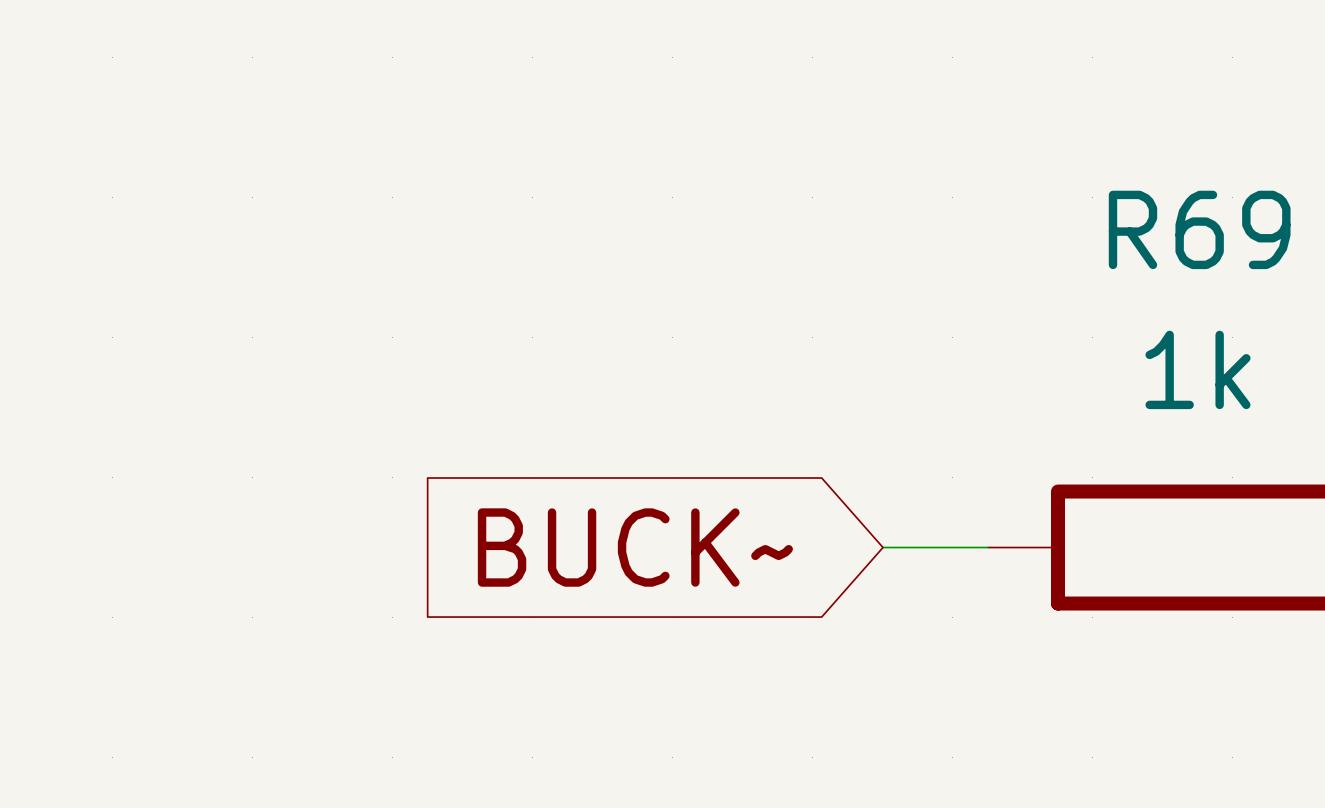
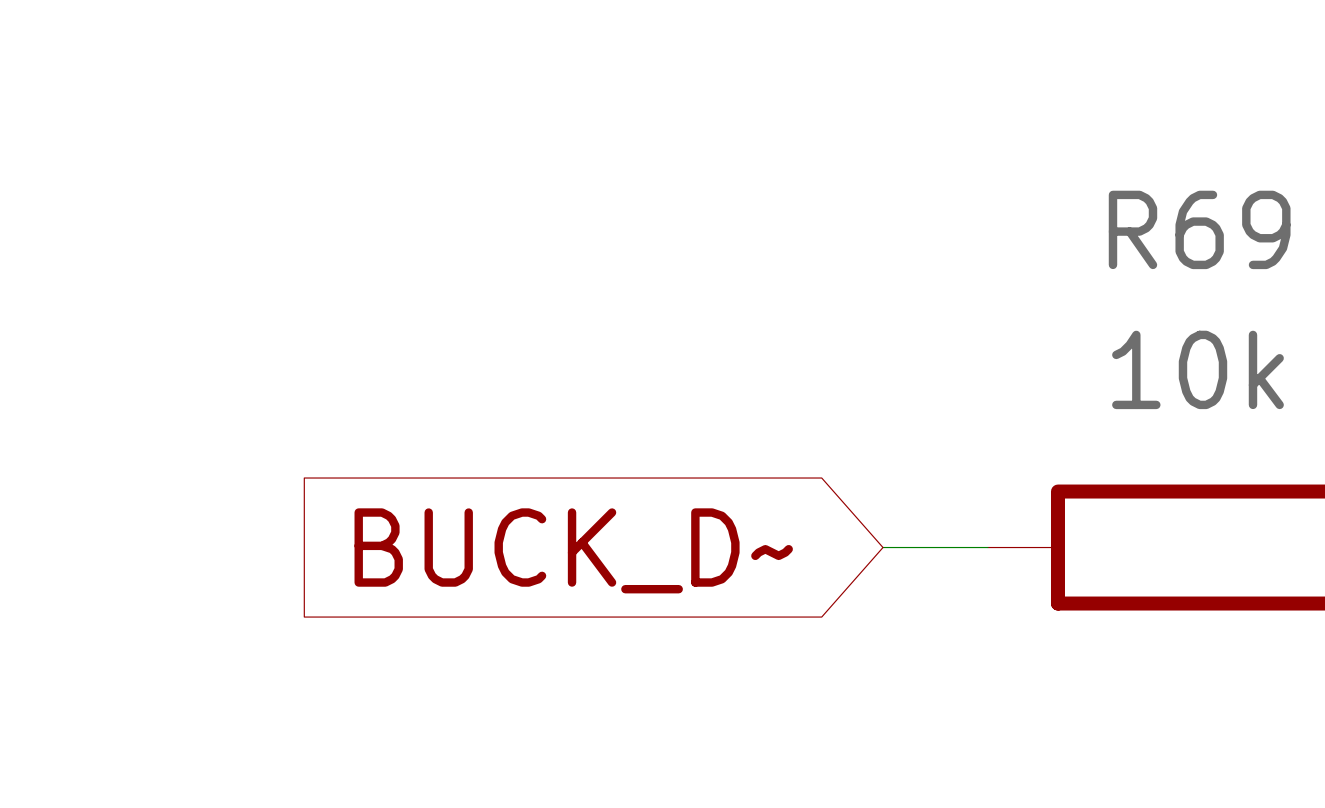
R69 value: 1k (1197, 369) -> 10k (1197, 369)
global label: BUCK~ (635, 547) -> BUCK_D~ (573, 550)

